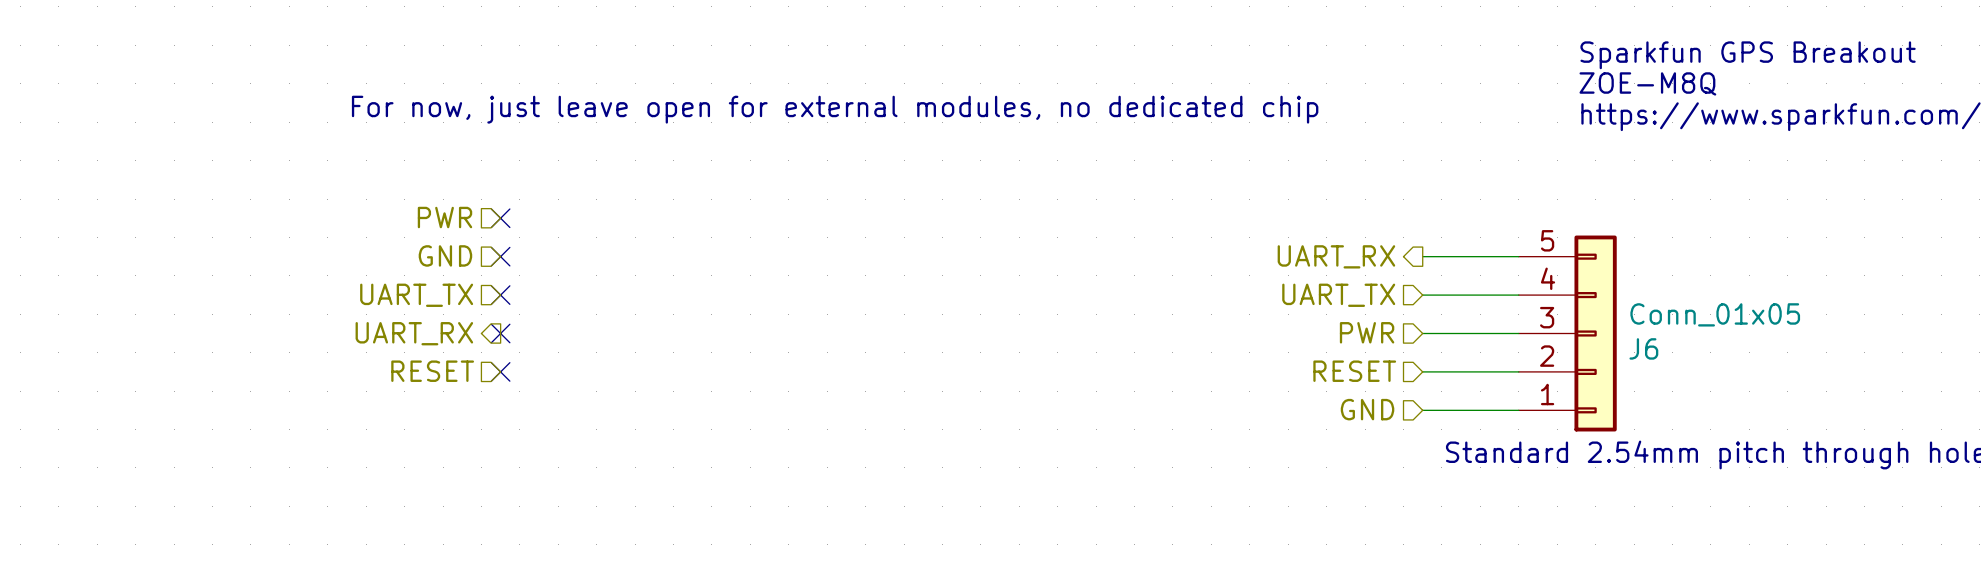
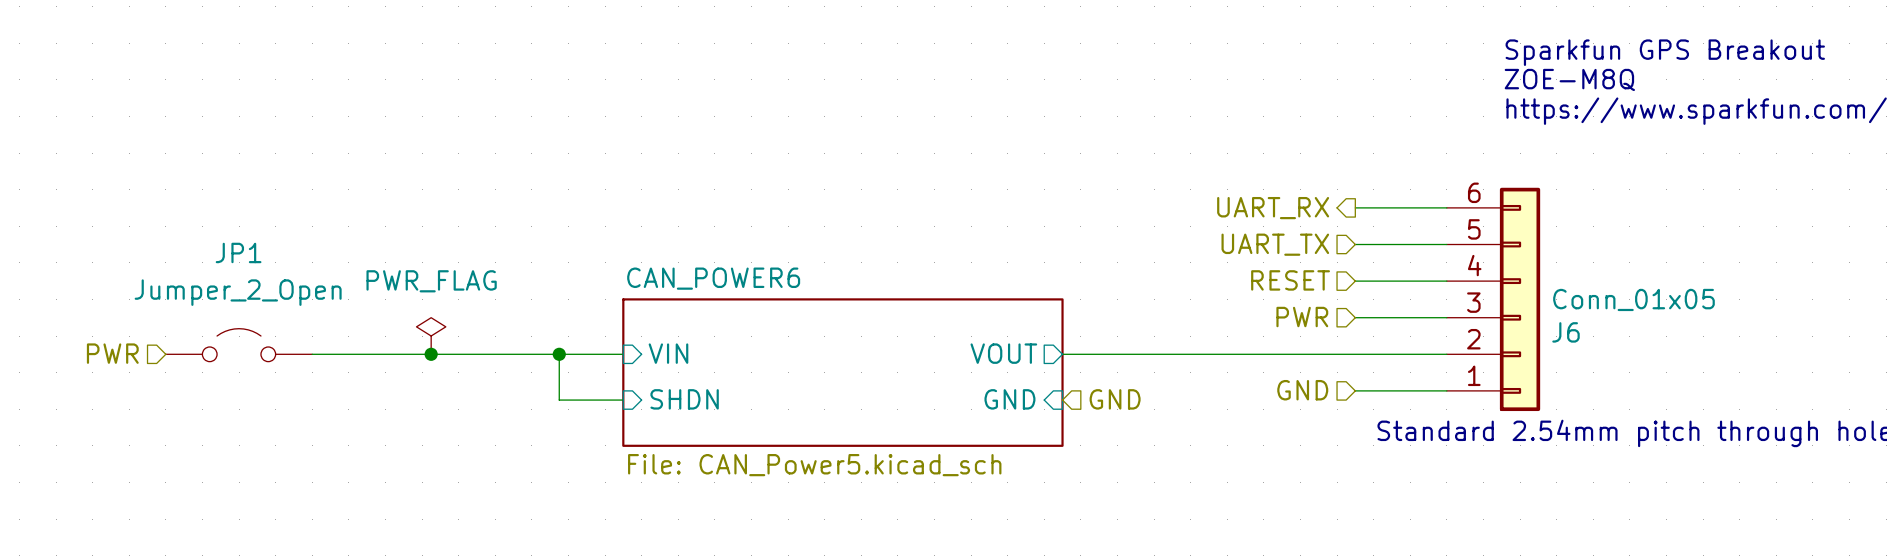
text: For now, just leave open for external modules, no dedicated chip (835, 109) -> none
hierarchical label position: PWR (444, 217) -> PWR (112, 353)
no-connect mark: (500, 218) -> none
hierarchical label: none -> UART_RX (1273, 208)
wire: none -> (1355, 207) (1446, 207)
J6 symbol: [1518, 235, 1617, 432] -> [1446, 187, 1541, 412]
hierarchical label: GND (445, 255) -> none
no-connect mark: (500, 256) -> none
hierarchical label shape: output (1336, 256) -> input (1275, 244)
hierarchical label: UART_RX (1336, 256) -> UART_TX (1275, 244)
hierarchical label: UART_TX (416, 295) -> none
no-connect mark: (500, 295) -> none
hierarchical label: UART_TX (1338, 295) -> RESET (1290, 280)
hierarchical label: UART_RX (414, 333) -> none
no-connect mark: (500, 333) -> none
power symbol: none -> PWR_FLAG (431, 336)
JP1: none -> Jumper_2_Open (239, 345)
wire: none -> (312, 354) (623, 354)
hierarchical label: RESET (432, 371) -> none
junction: none -> (431, 354)
no-connect mark: (500, 371) -> none
wire: none -> (559, 354) (559, 400) (623, 400)
junction: none -> (559, 354)
sheet pin: none -> VIN (668, 353)
sheet pin: none -> VOUT (1003, 353)
wire: none -> (1062, 354) (1355, 354)
hierarchical label: RESET (1354, 371) -> none
sheet CAN_POWER6: none -> File: CAN_Power5.kicad_sch (842, 372)
sheet pin: none -> SHDN (684, 399)
sheet pin: none -> GND (1009, 399)
hierarchical label: none -> GND (1115, 399)

